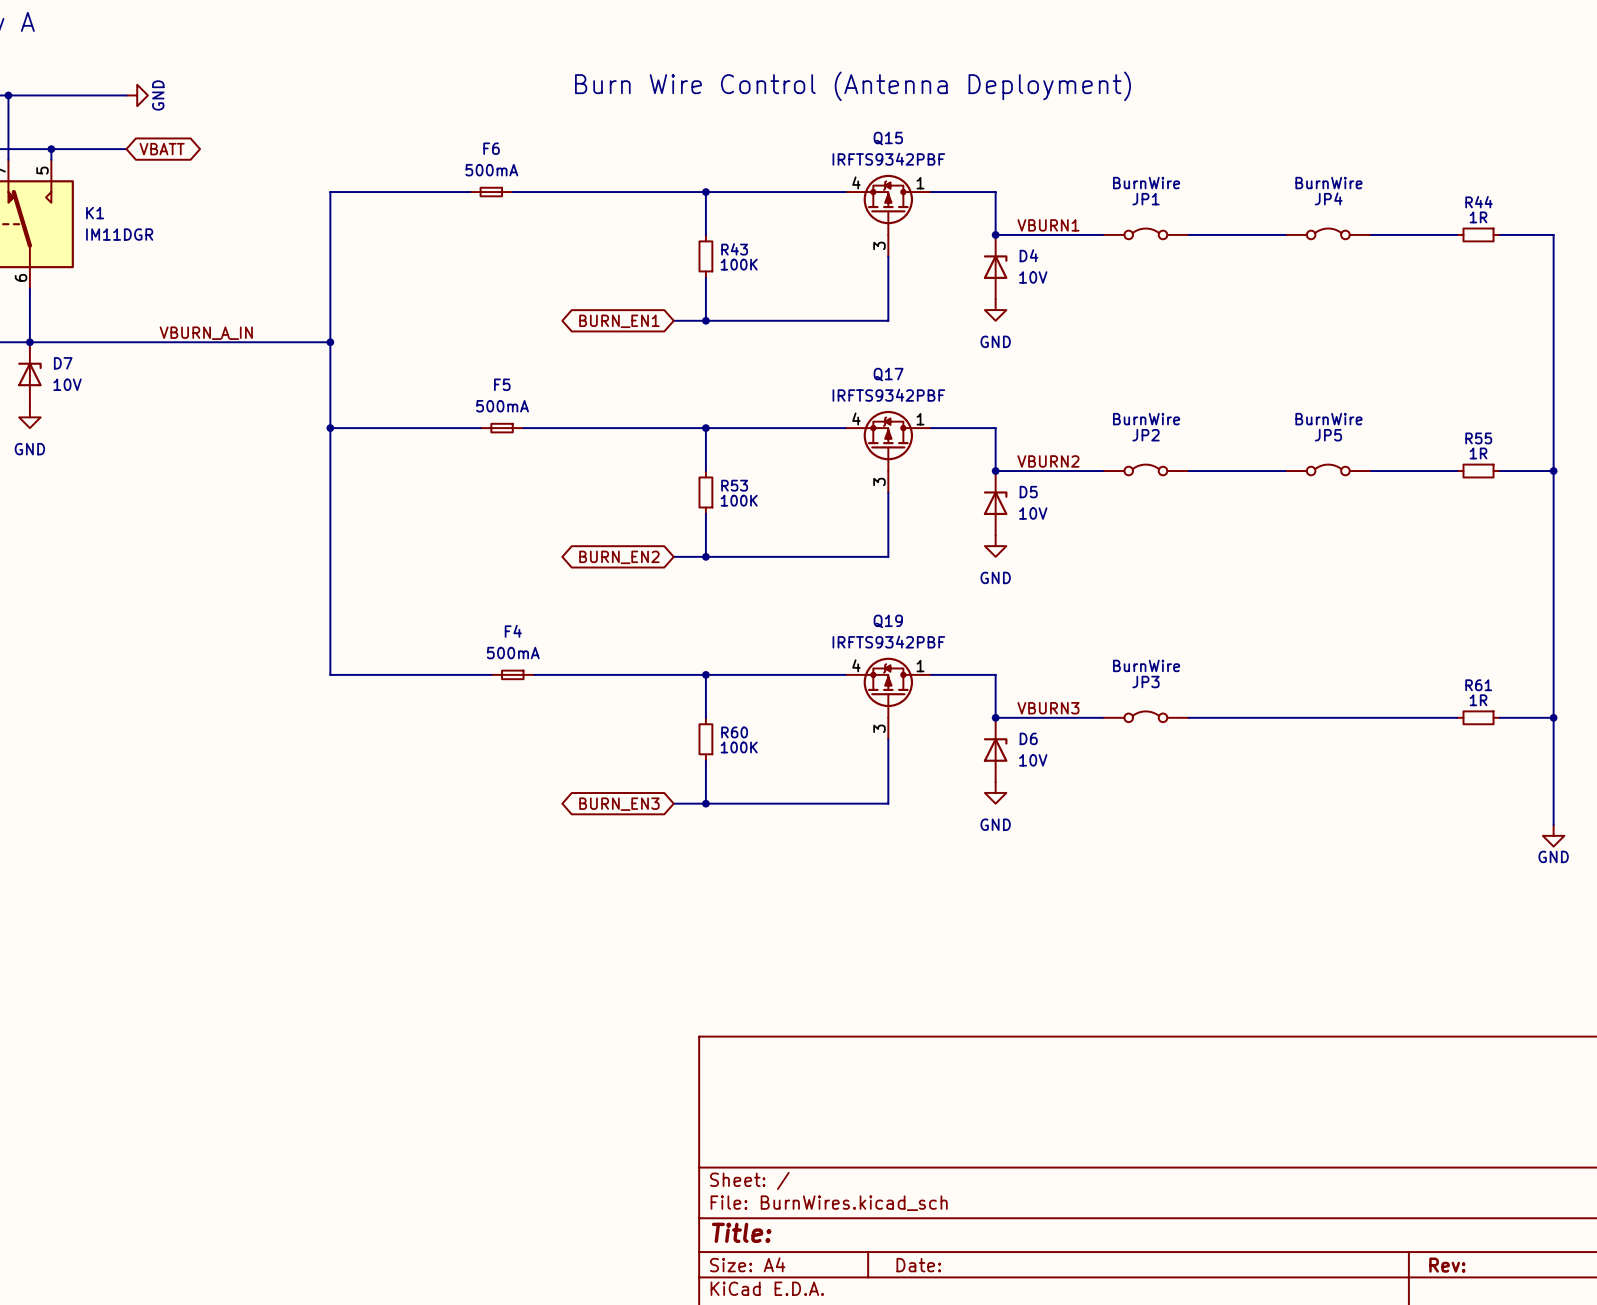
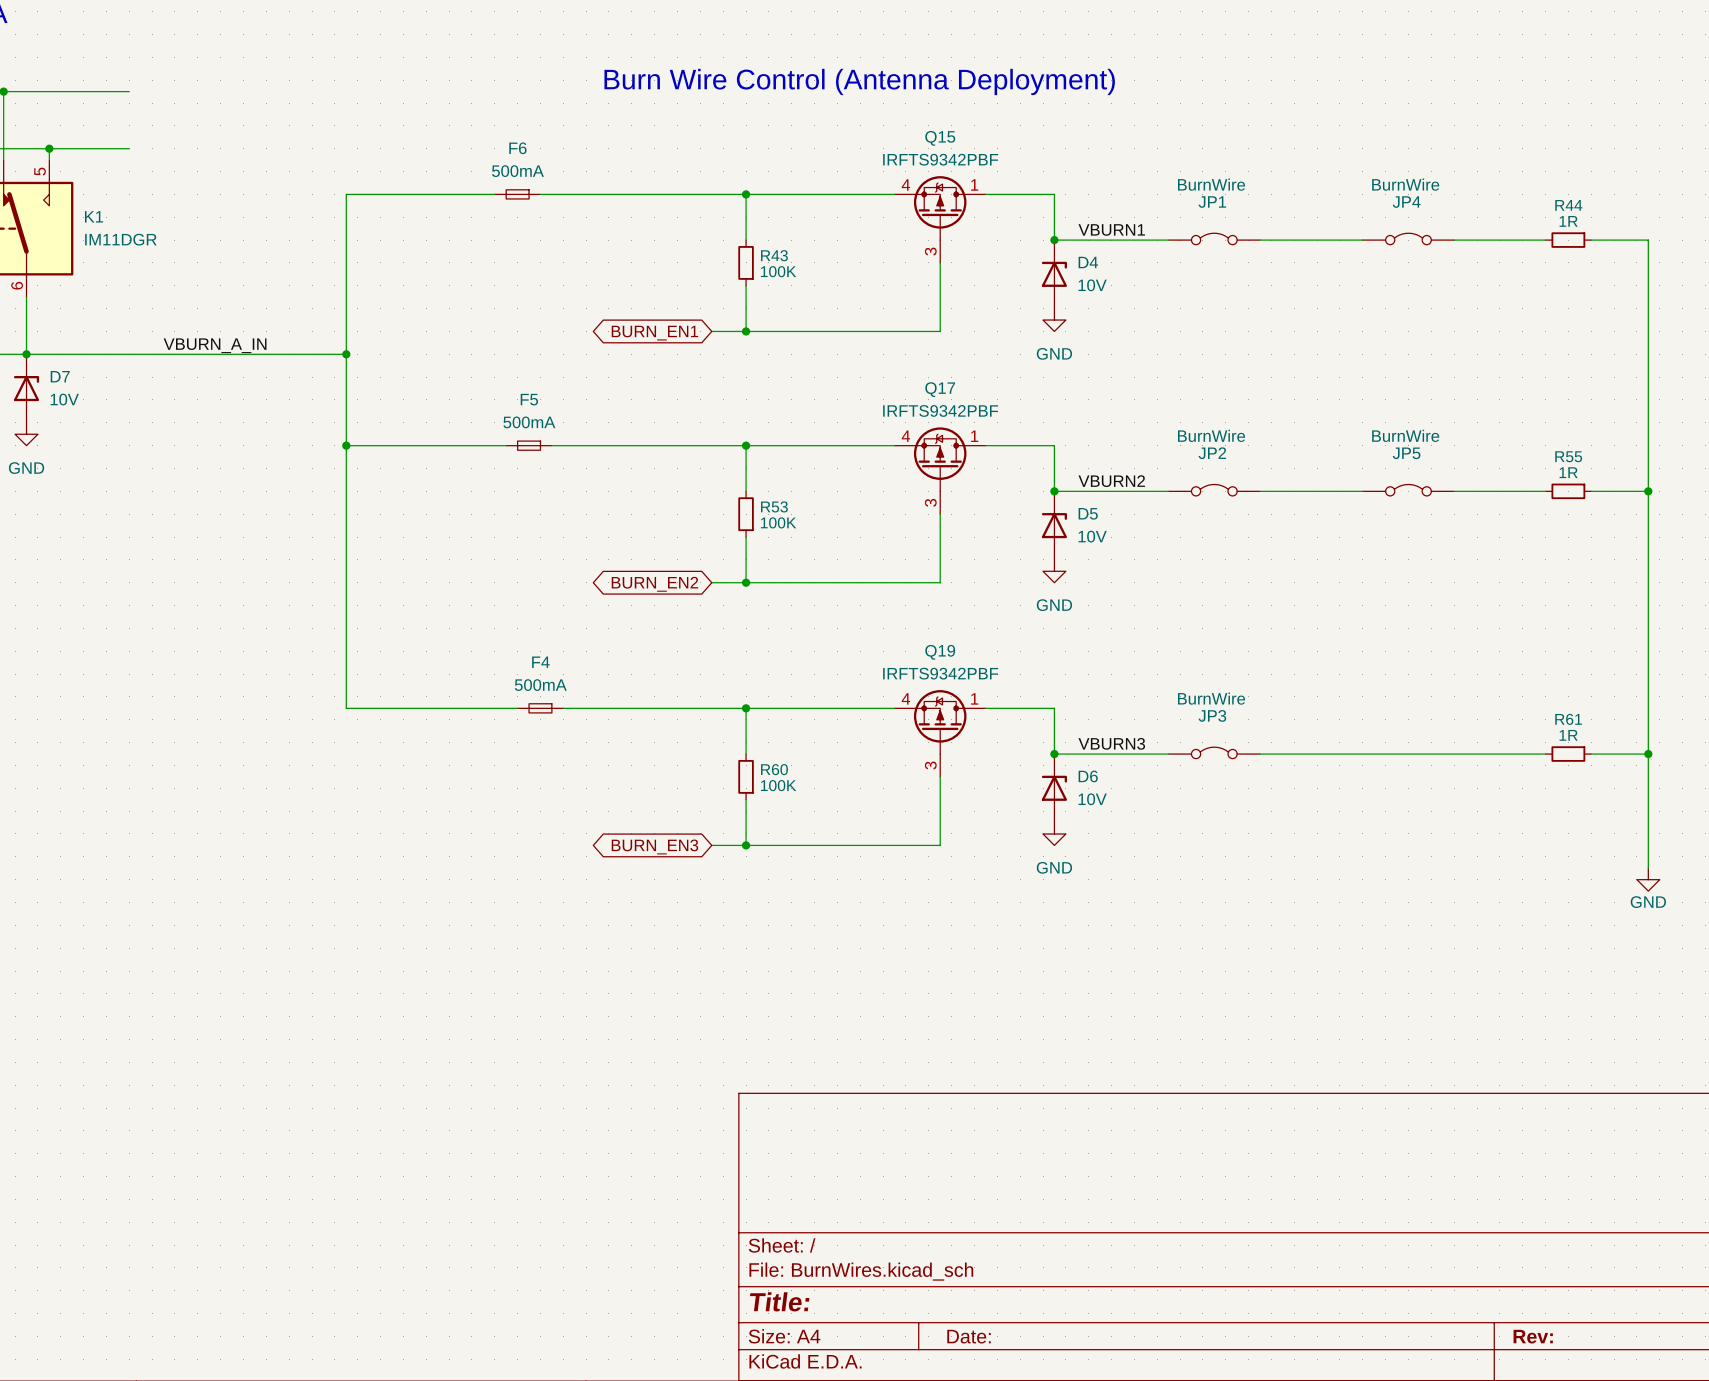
power symbol: GND (137, 95) -> none
global label: VBATT (162, 149) -> none

